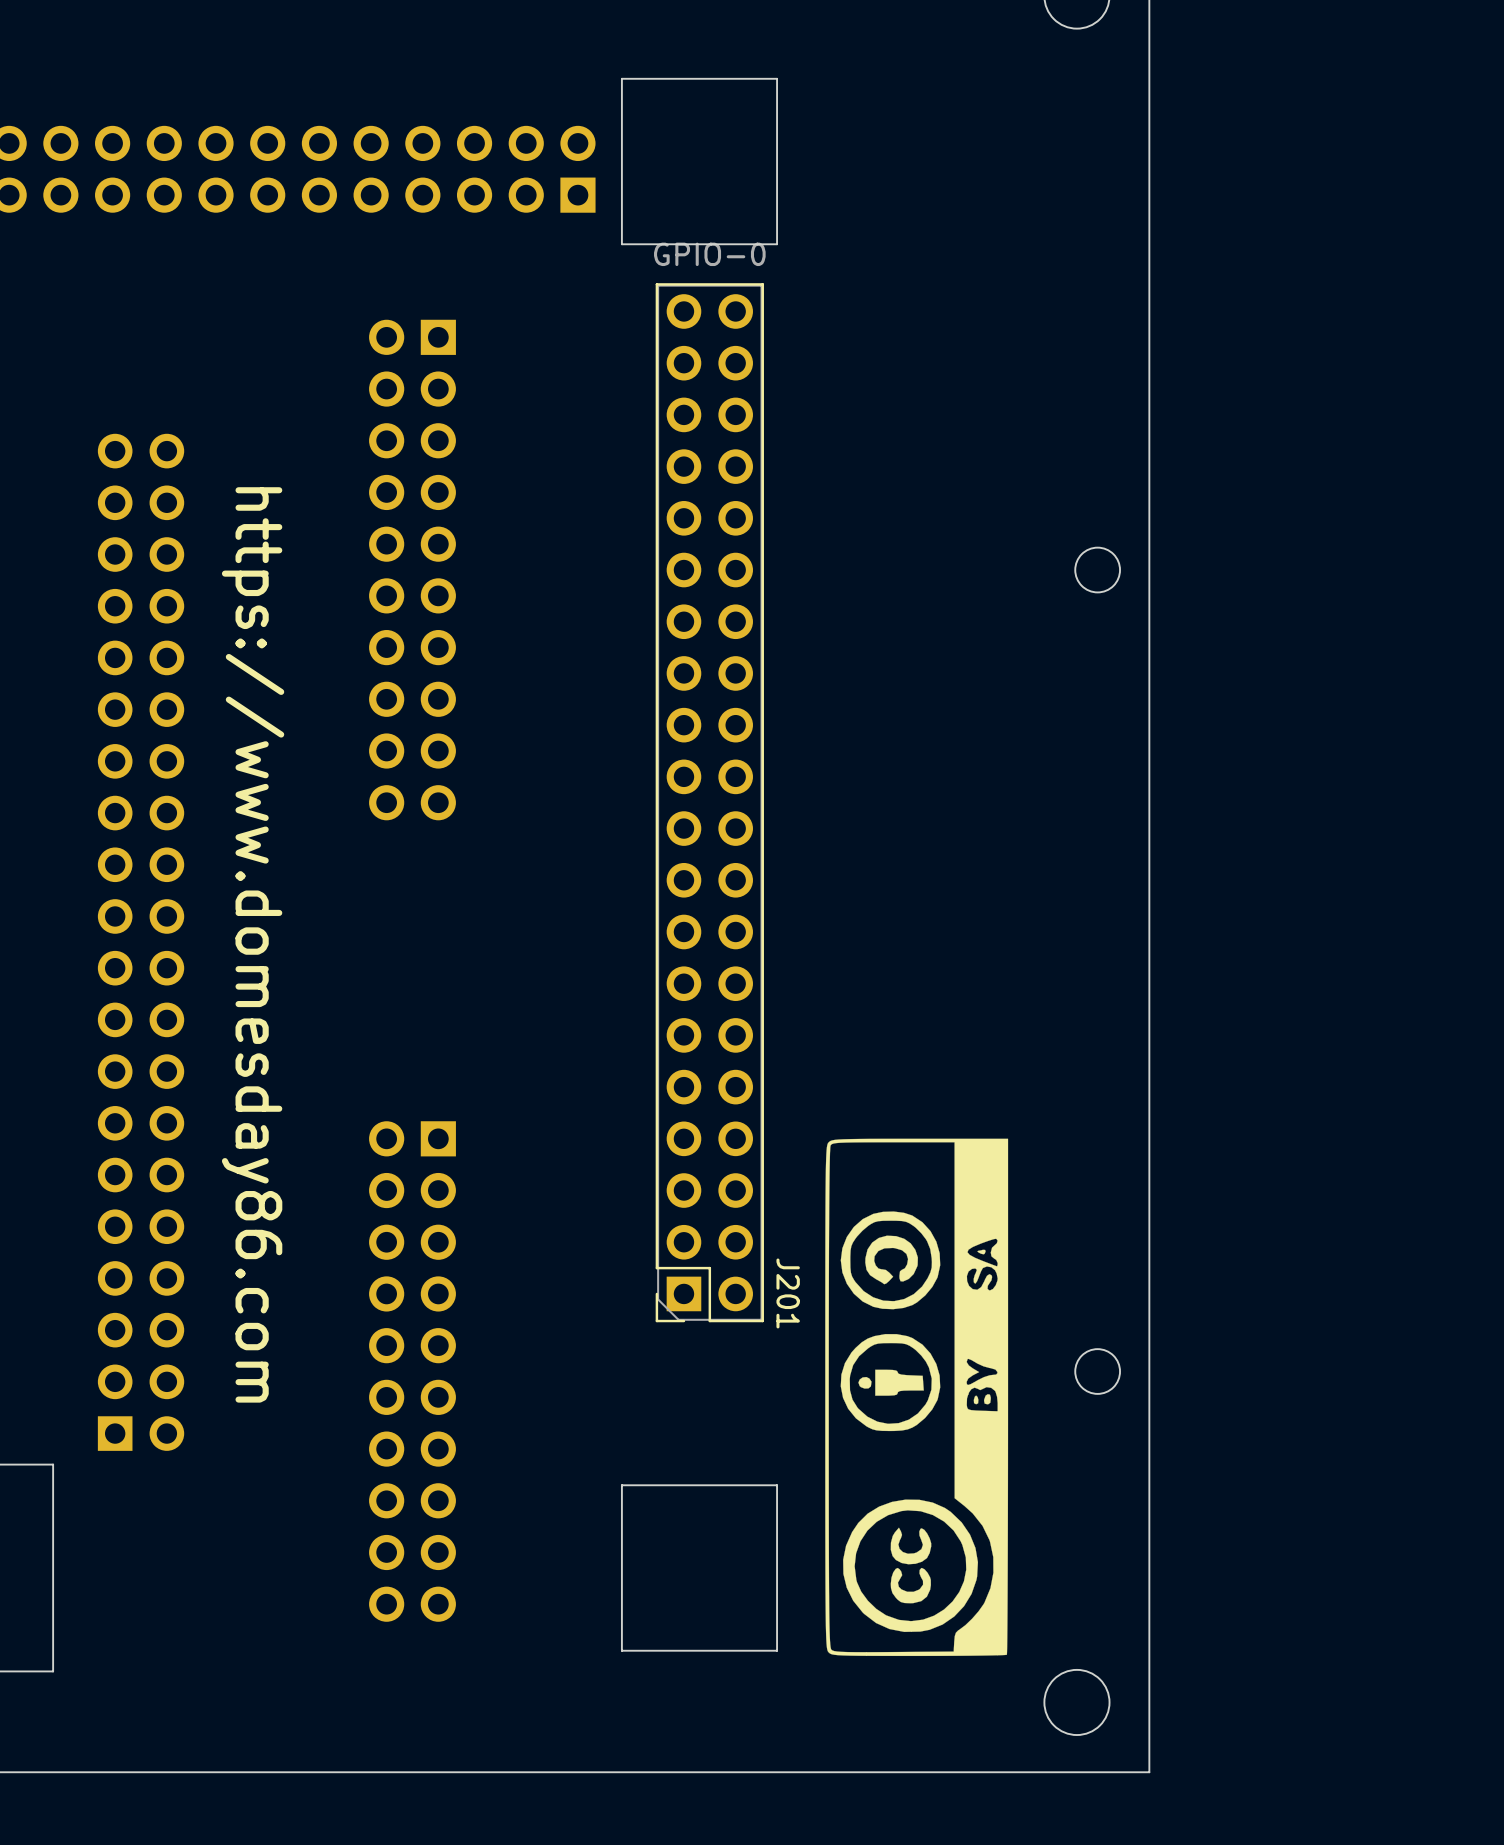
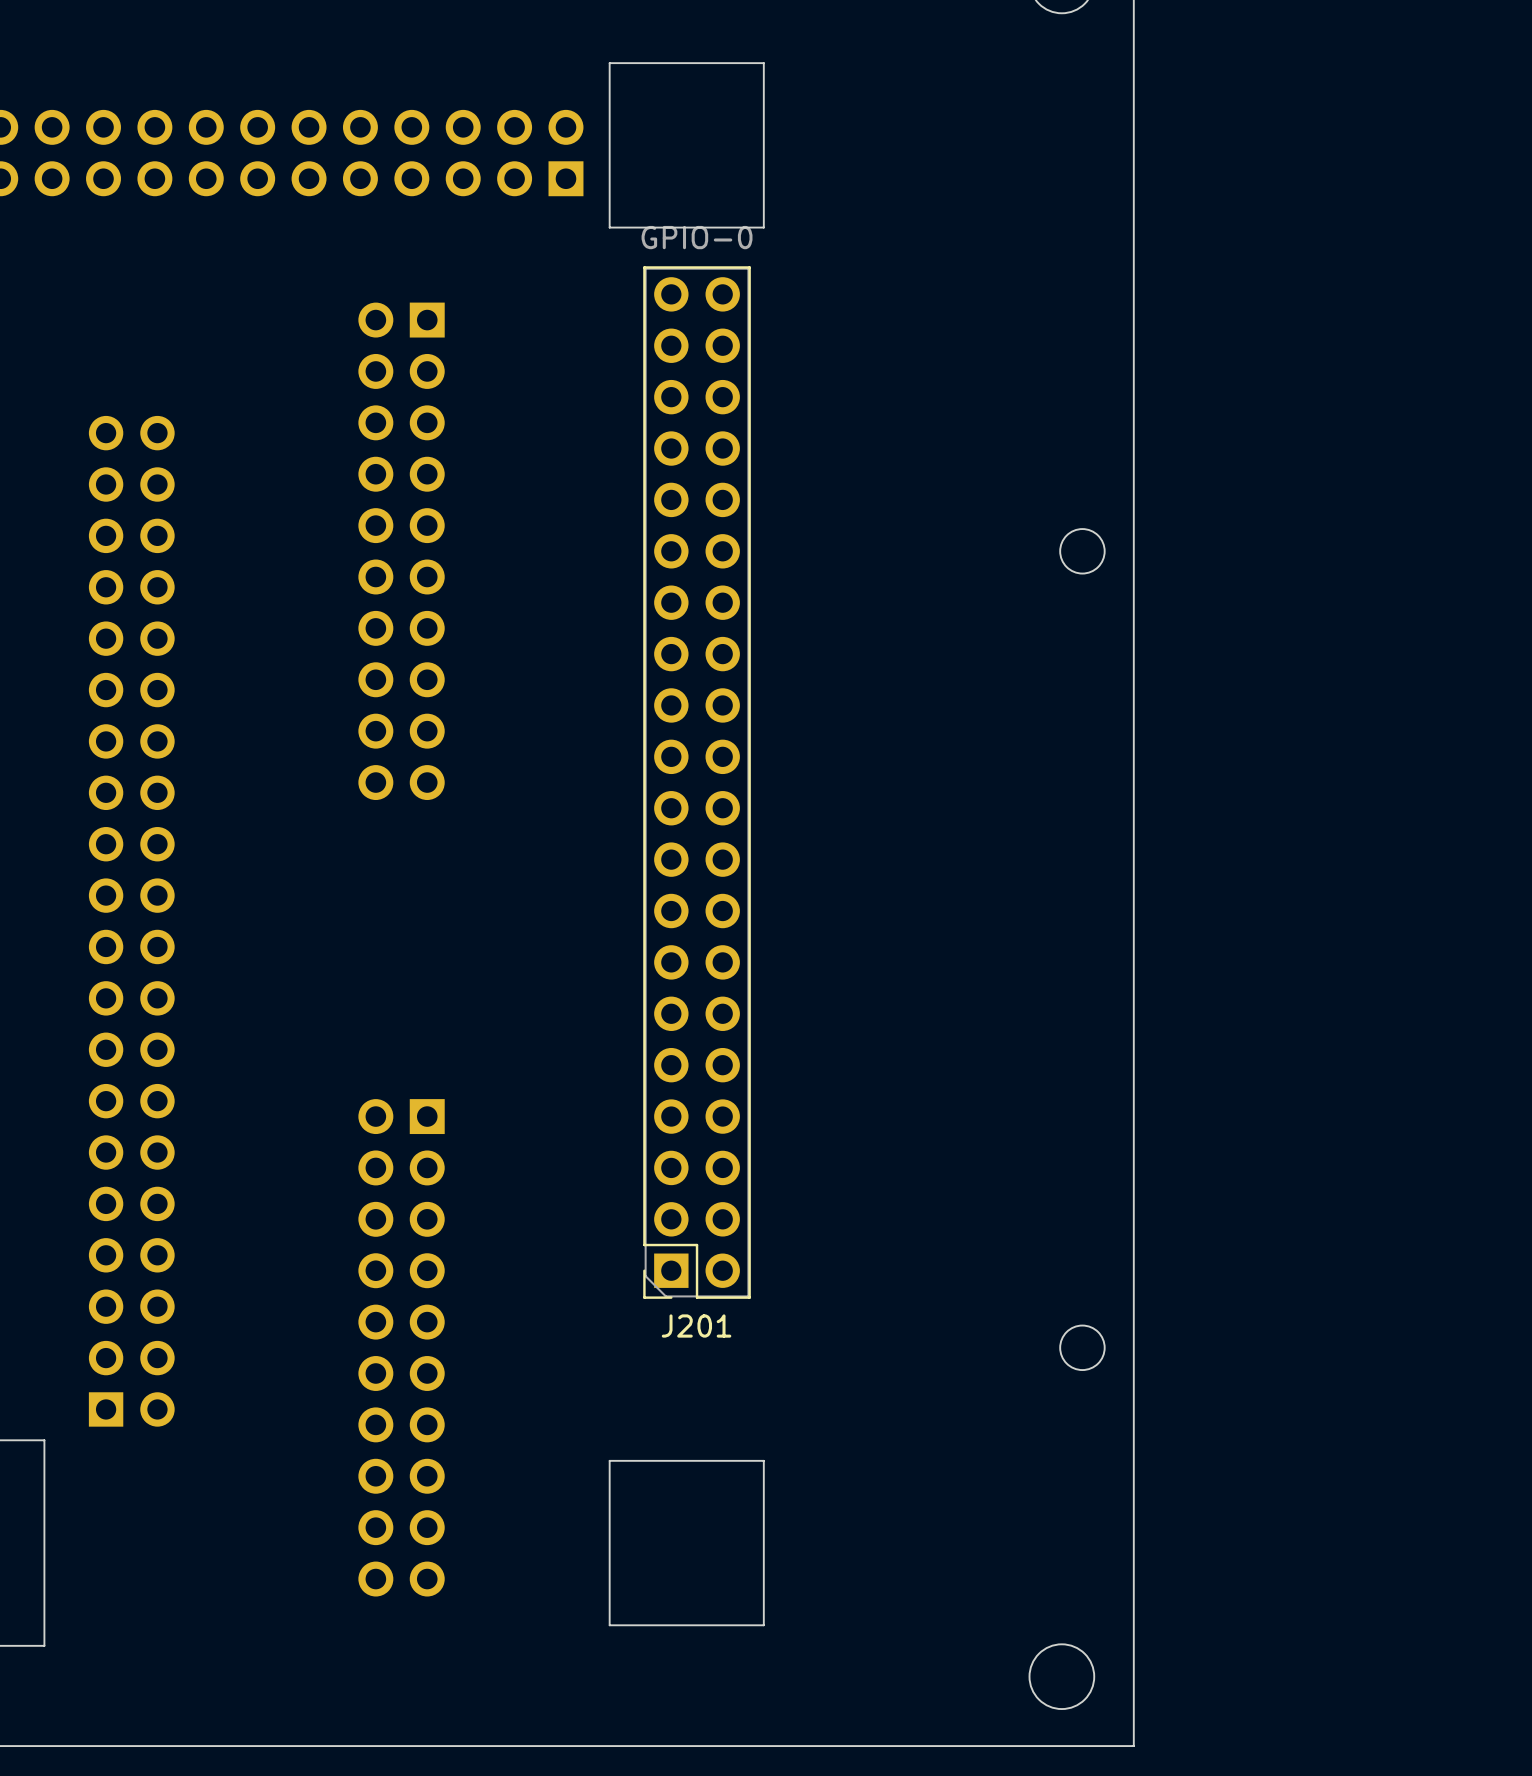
text: https://www.domesday86.com (253, 944) -> none
drawing: [825, 1138, 1009, 1657] -> none
J201 name rotation: 0° (788, 1293) -> 90° counterclockwise (696, 1326)
J201 name position: J201 (788, 1293) -> J201 (696, 1326)

